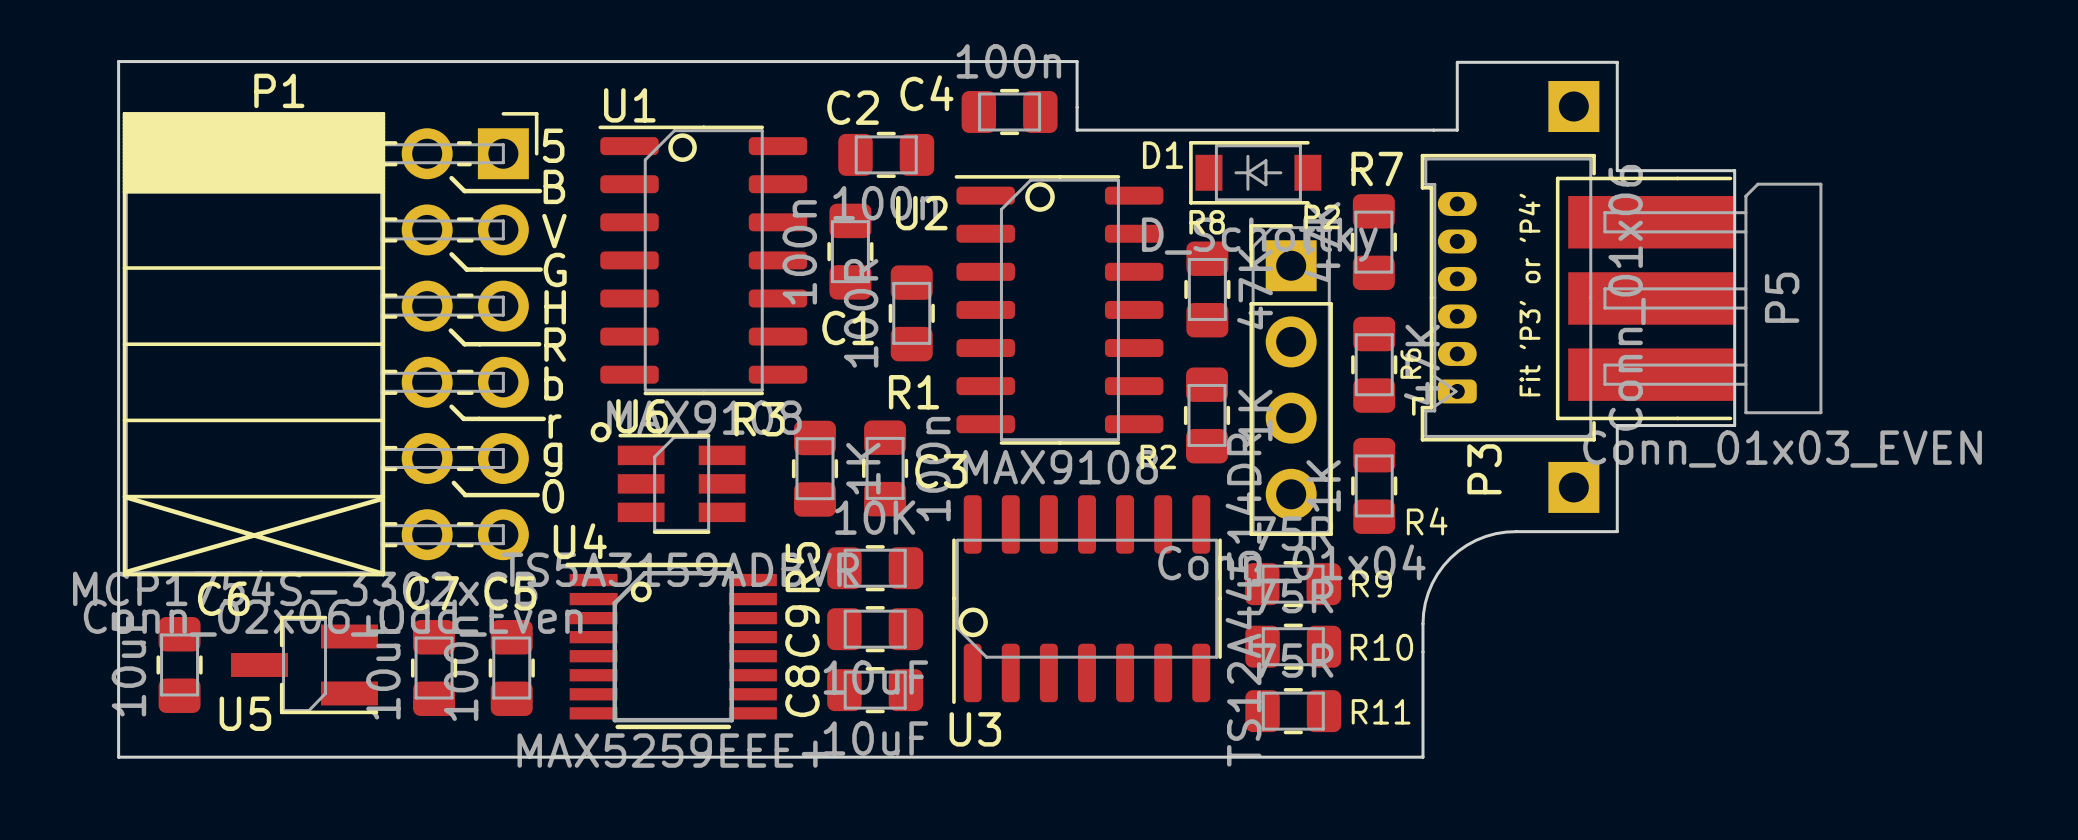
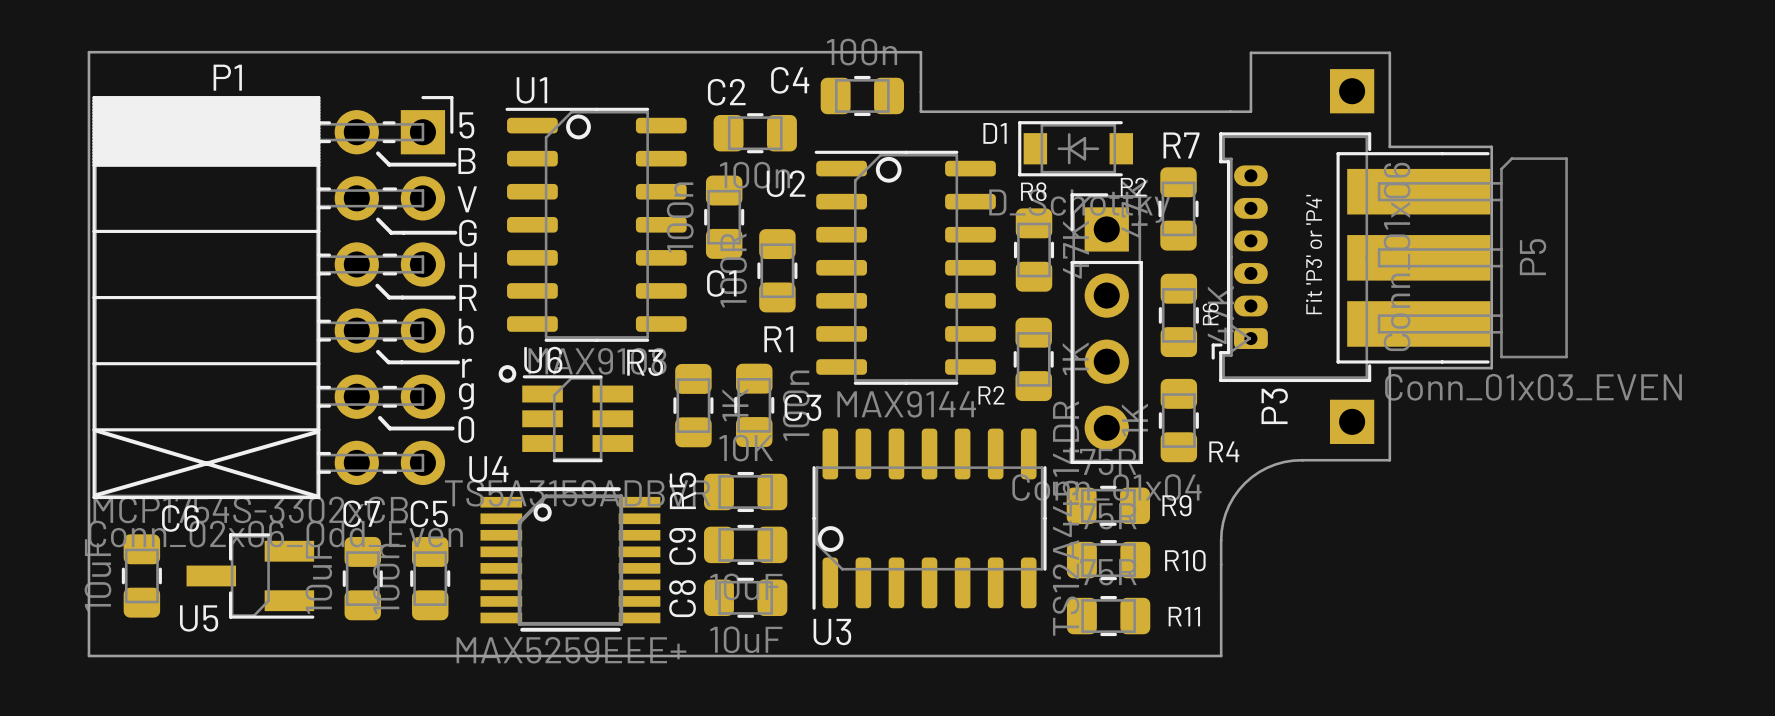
U2 value: MAX9108 (1060, 467) -> MAX9144 (906, 404)

